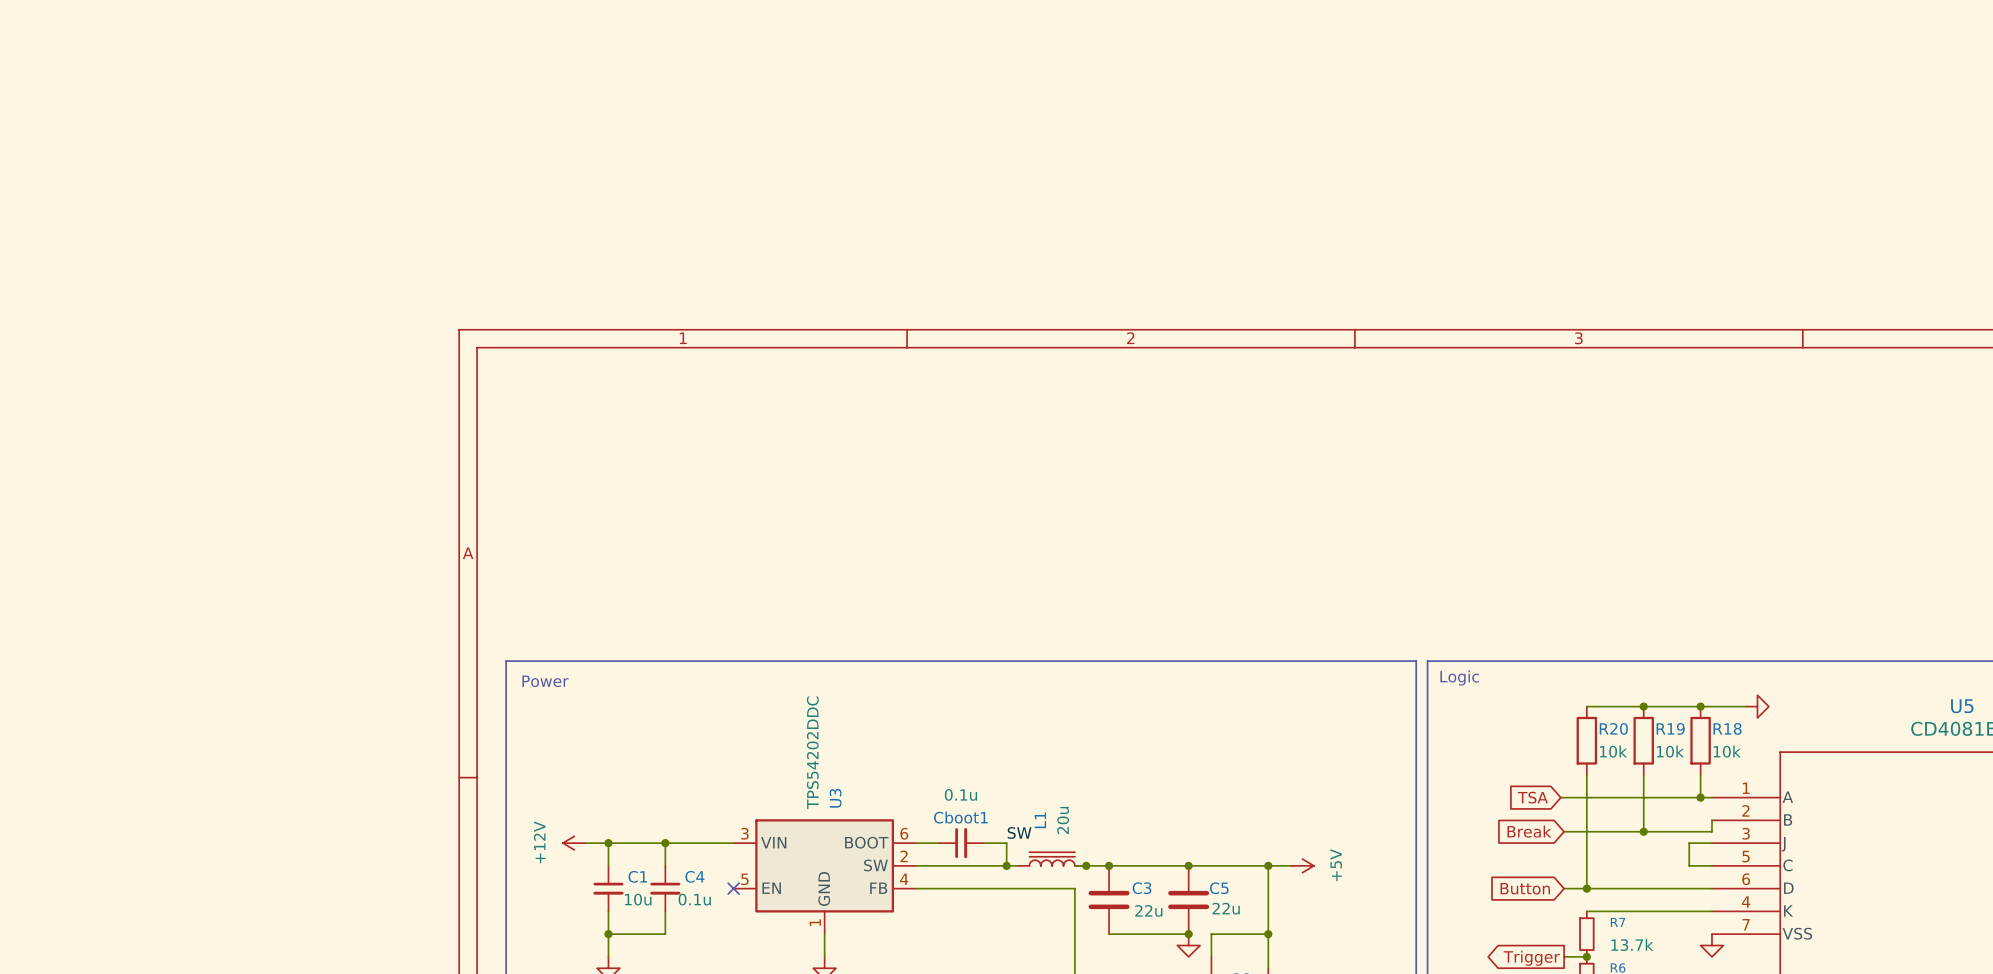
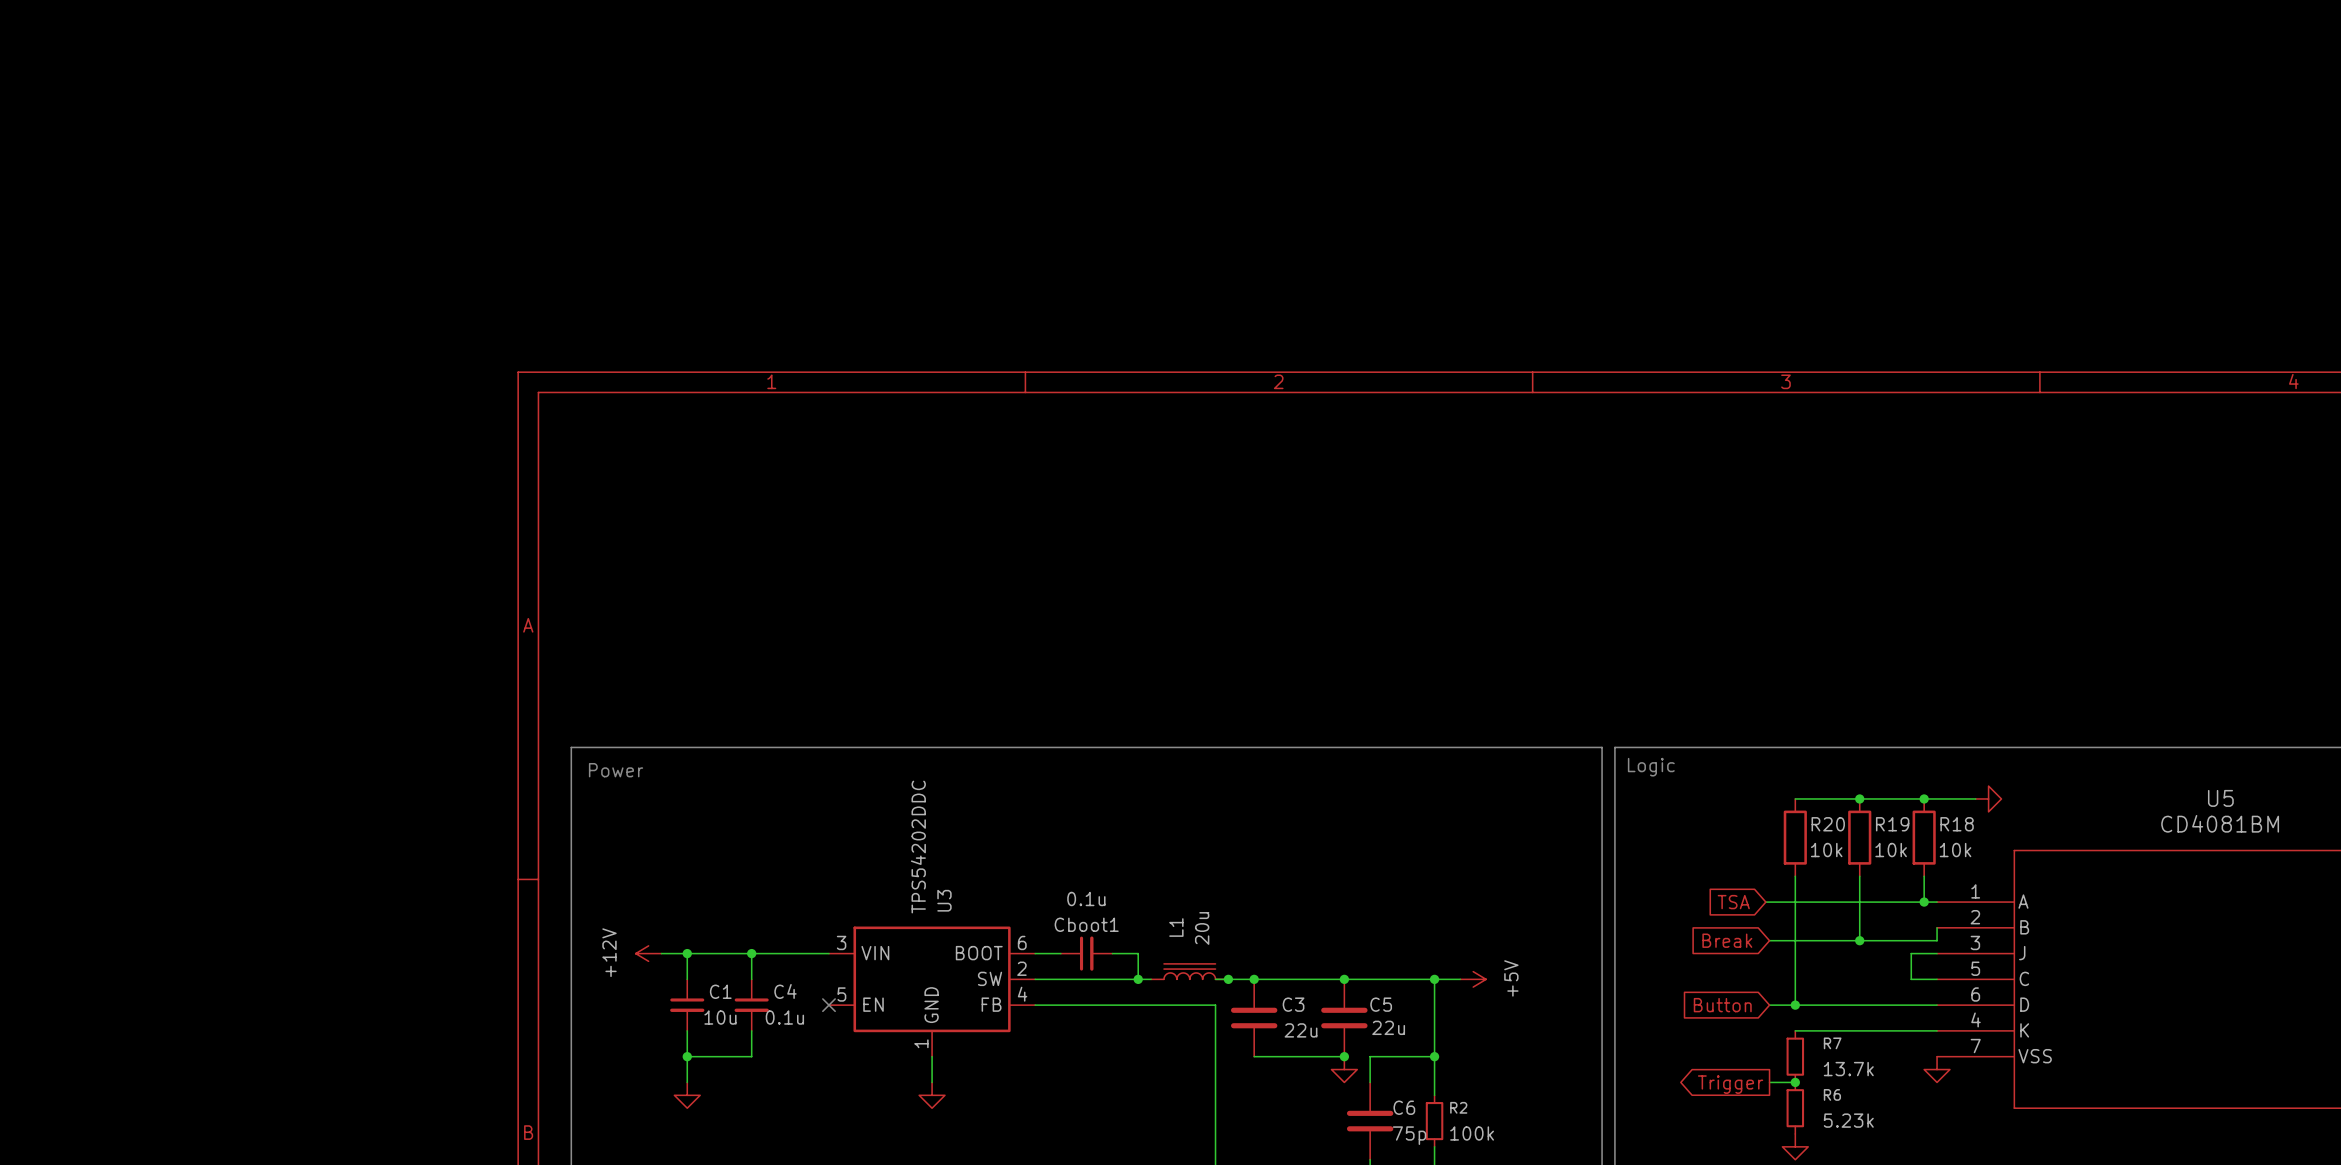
label: SW (1019, 832) -> none

